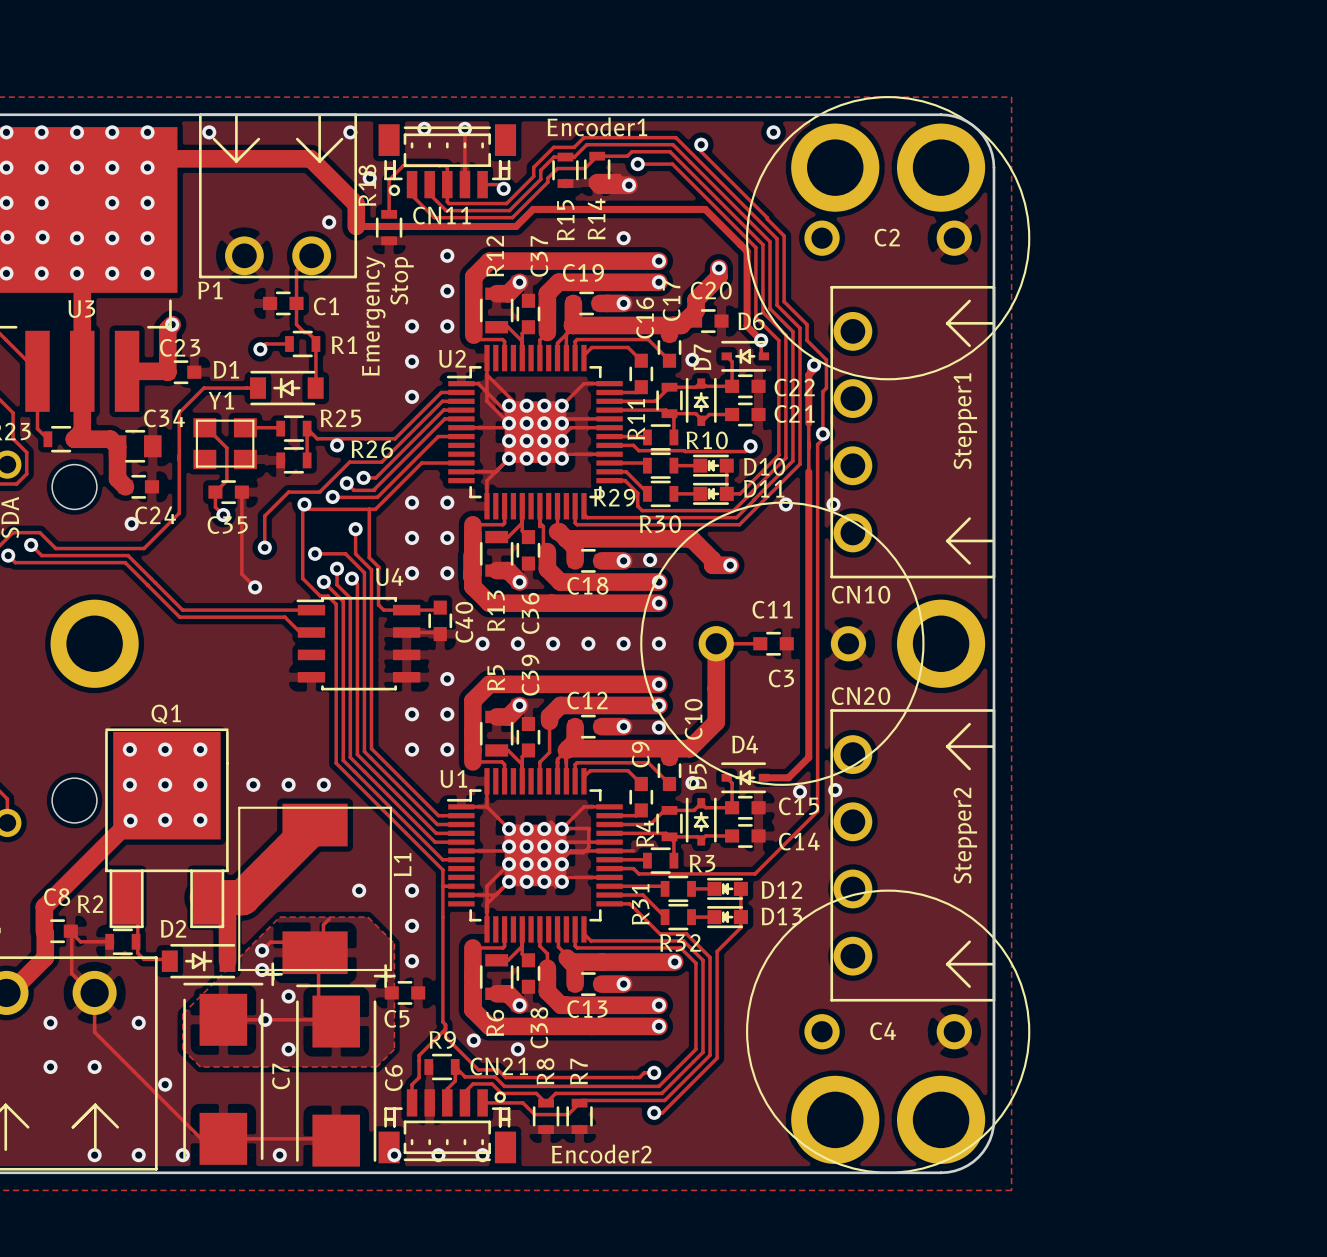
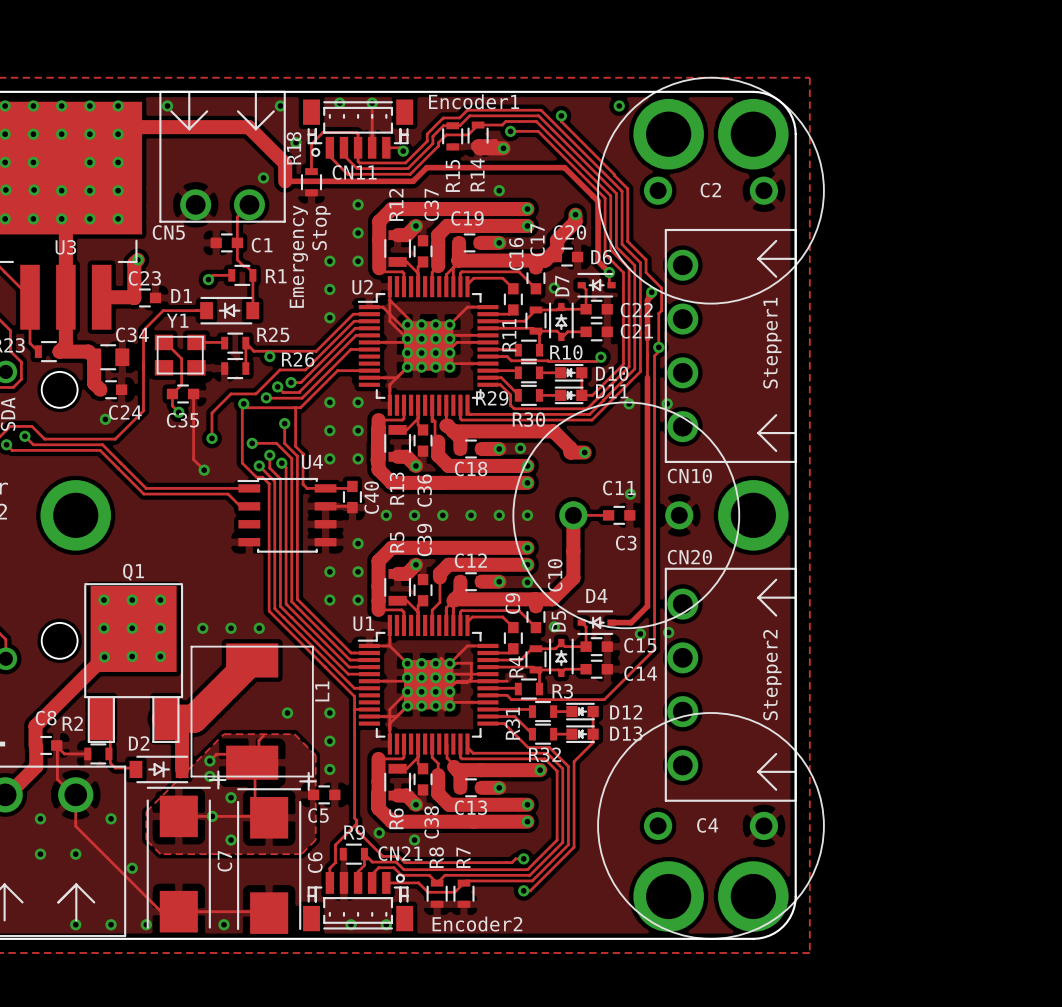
P1 name: P1 (210, 290) -> CN5 (168, 232)
via: none -> (630, 494)
via: (394, 1155) -> none

